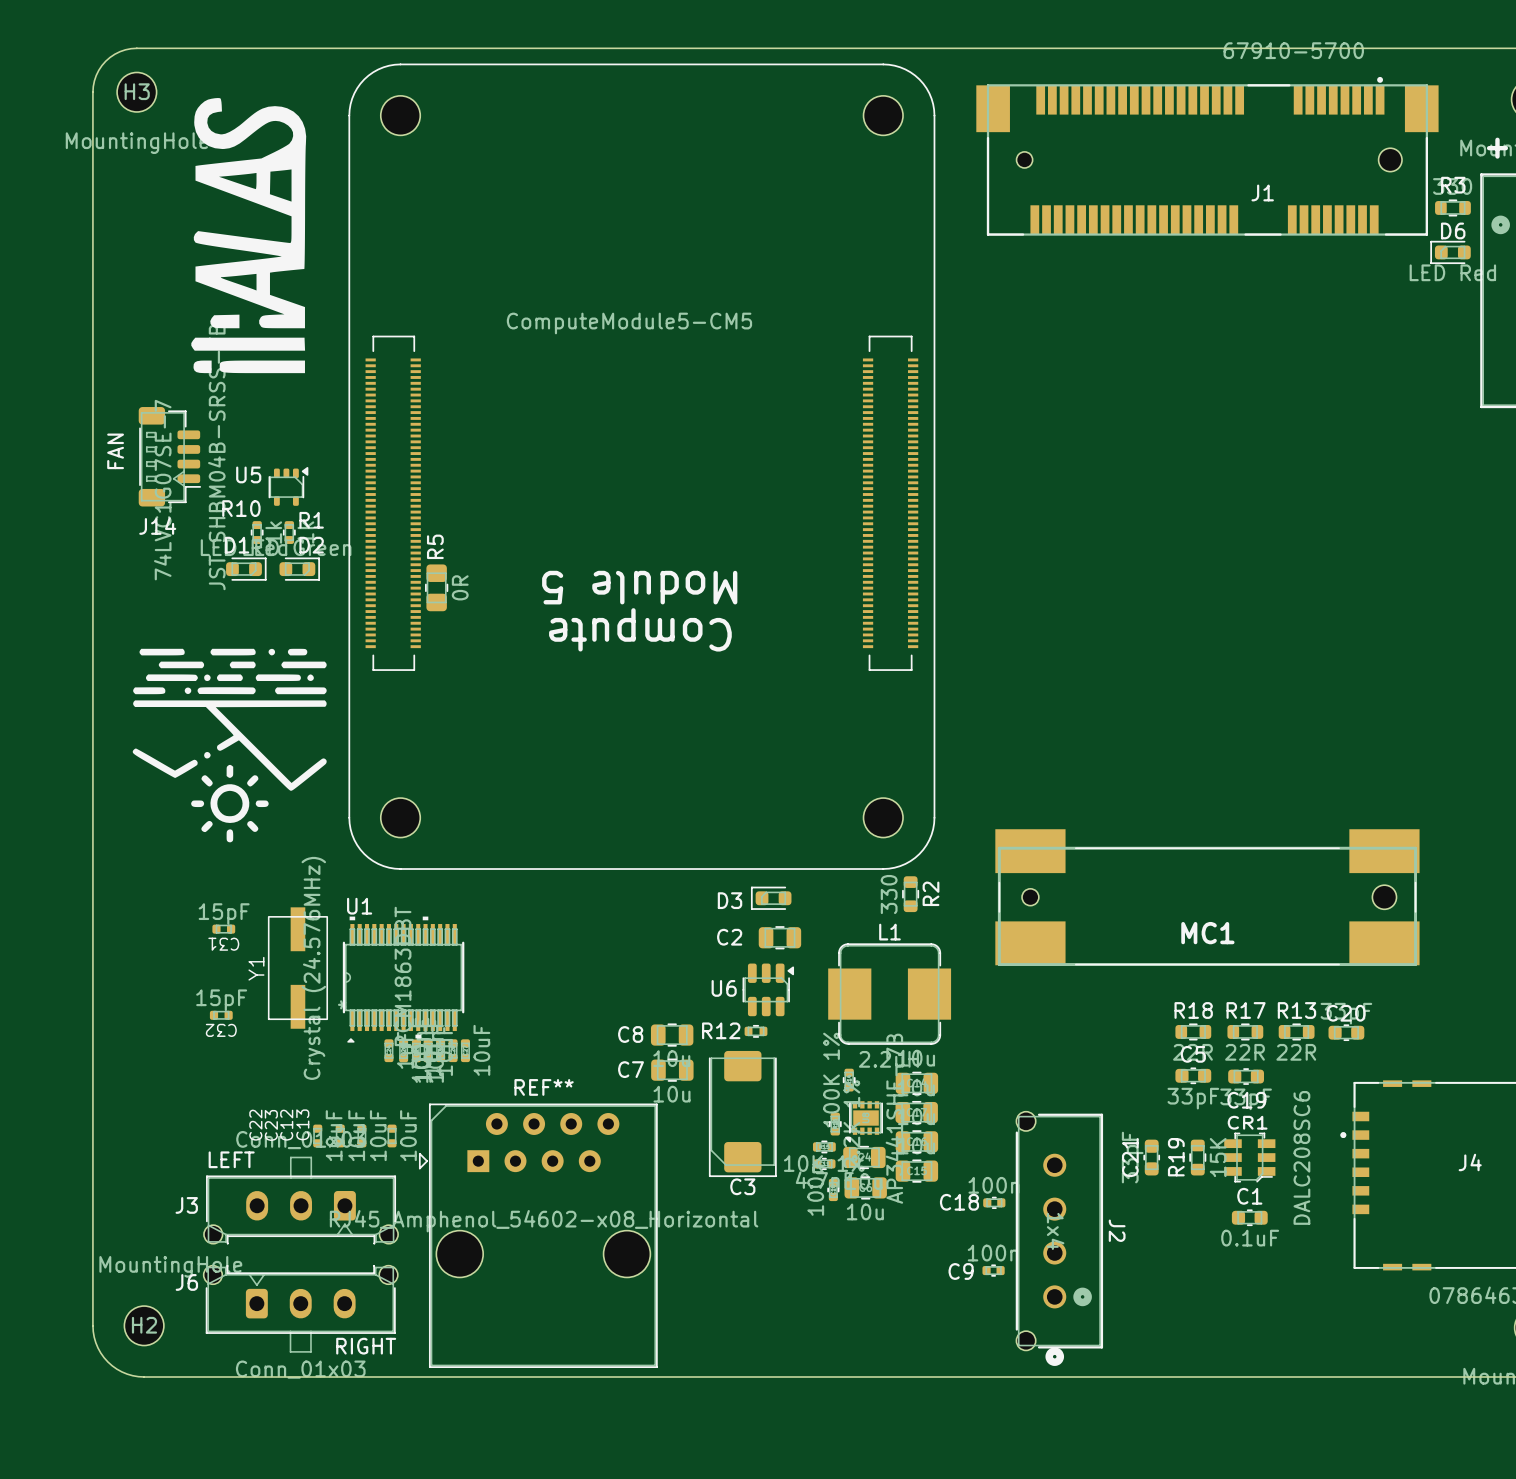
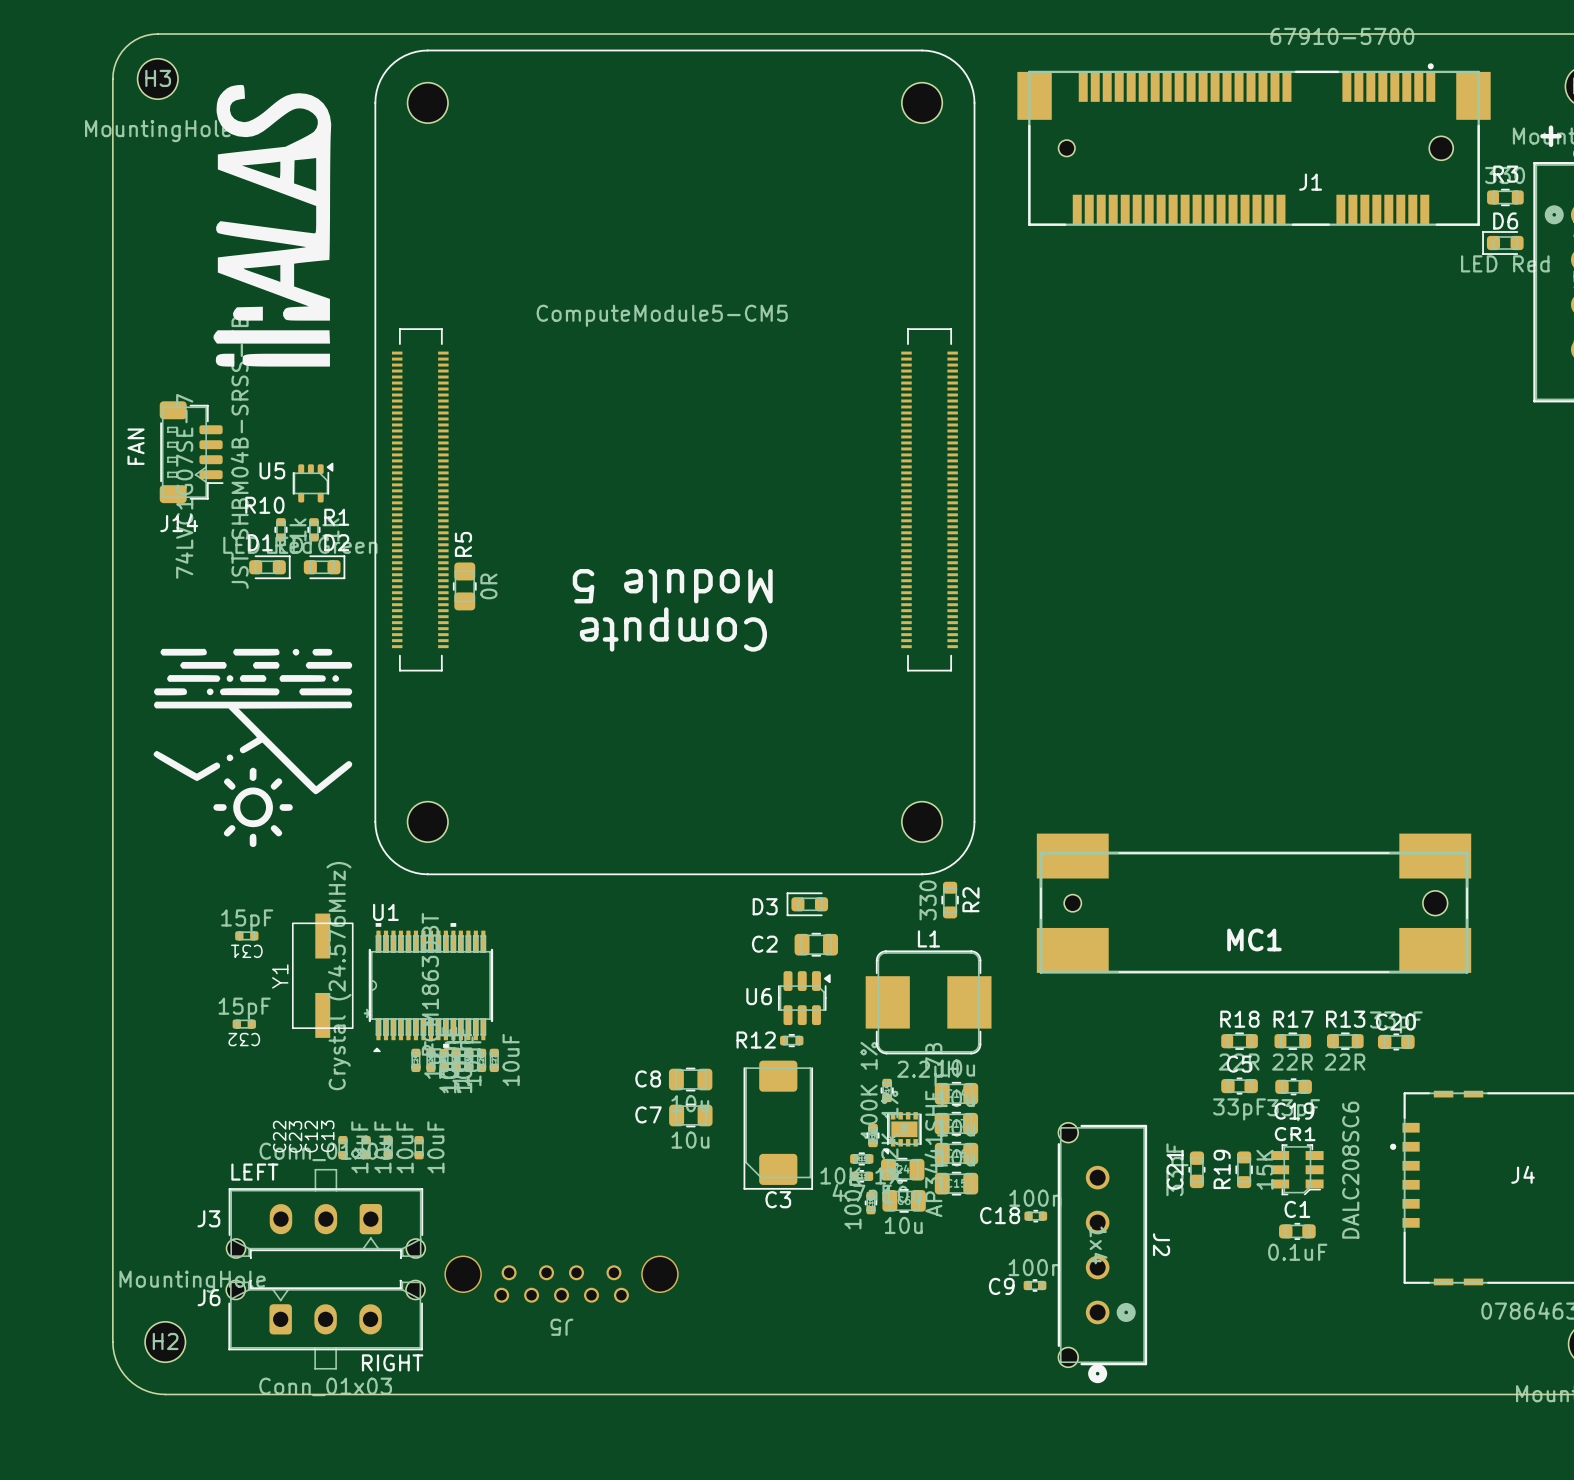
C8 position: (672, 1035) -> (690, 1079)
C7 position: (672, 1070) -> (690, 1115)
REF**: RJ45_Amphenol_54602-x08_Horizontal (538, 1235) -> none
J5: none -> (561, 1279)

